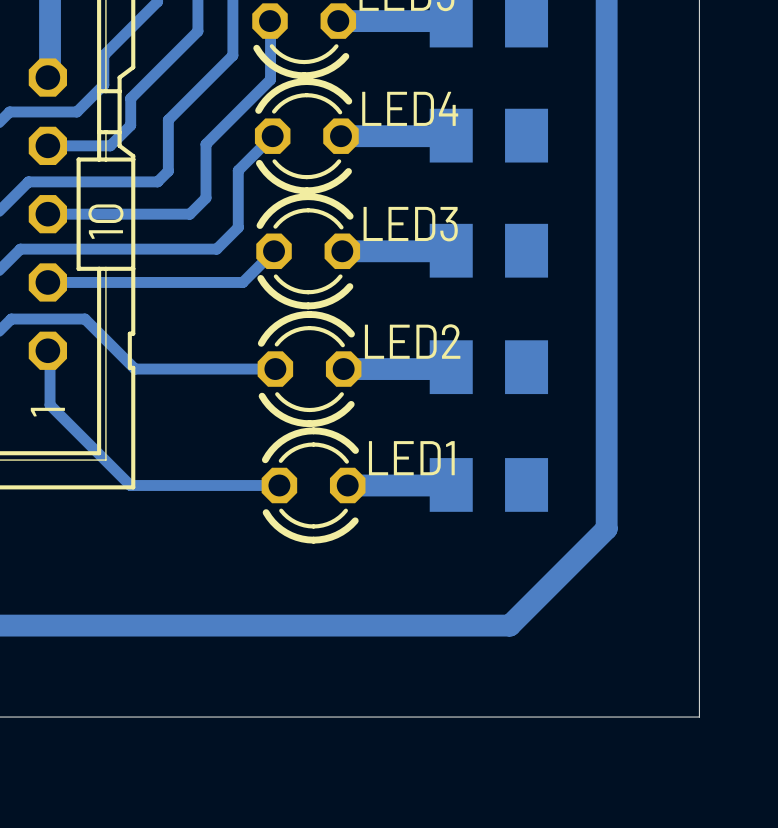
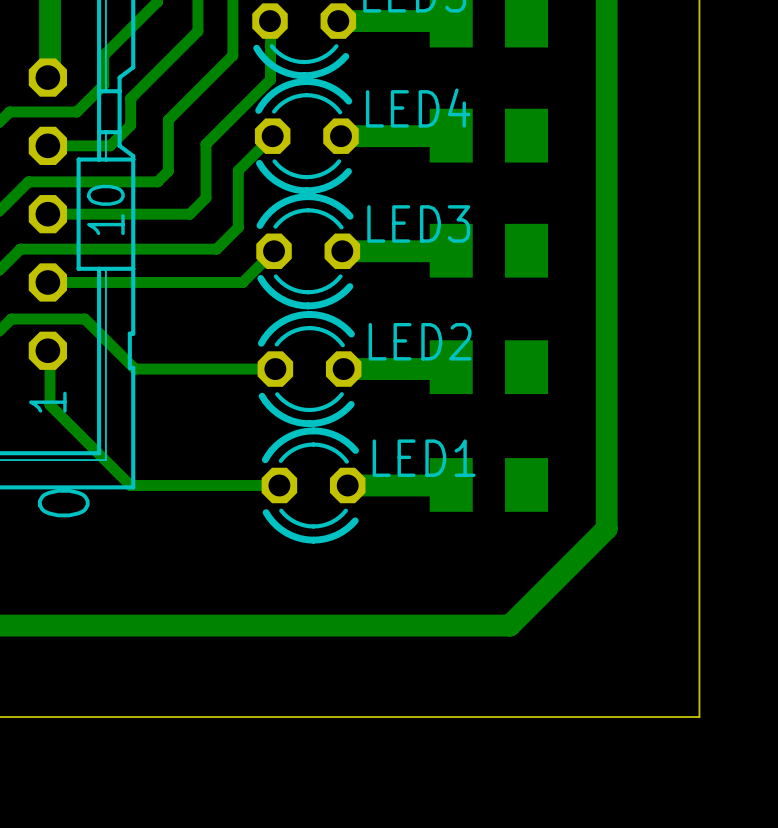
text: none -> 0 (63, 503)

